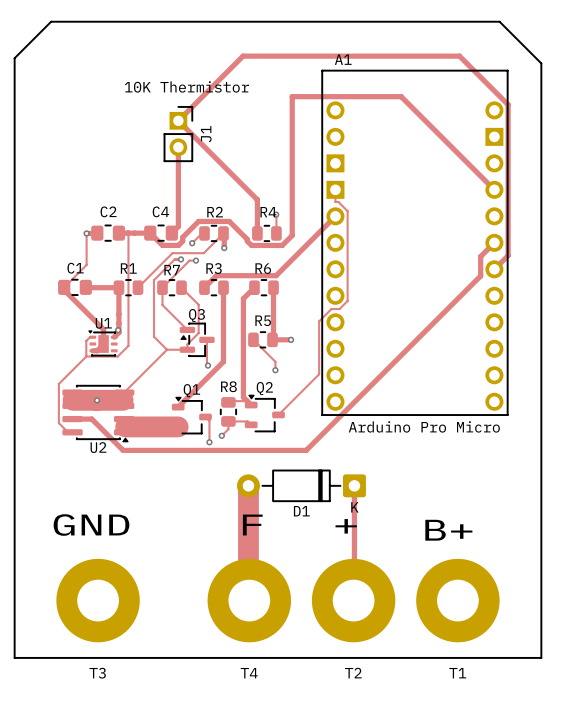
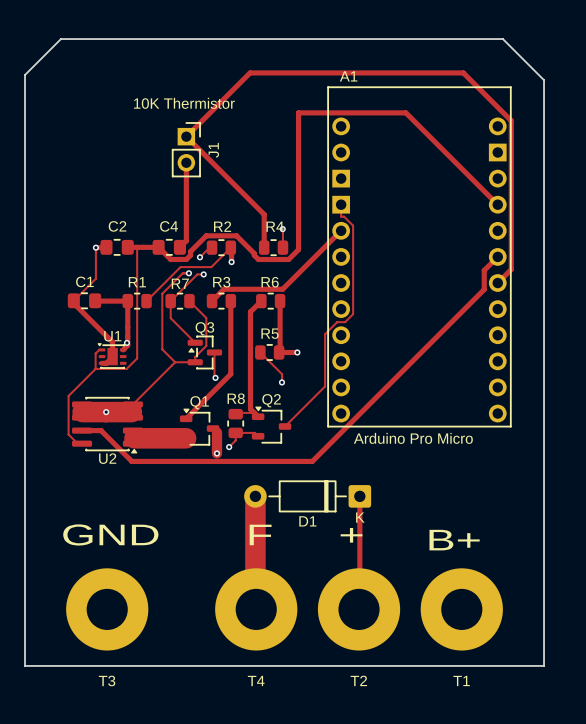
track width: thin (209, 420) (209, 442) -> thick (216, 432) (216, 453)

